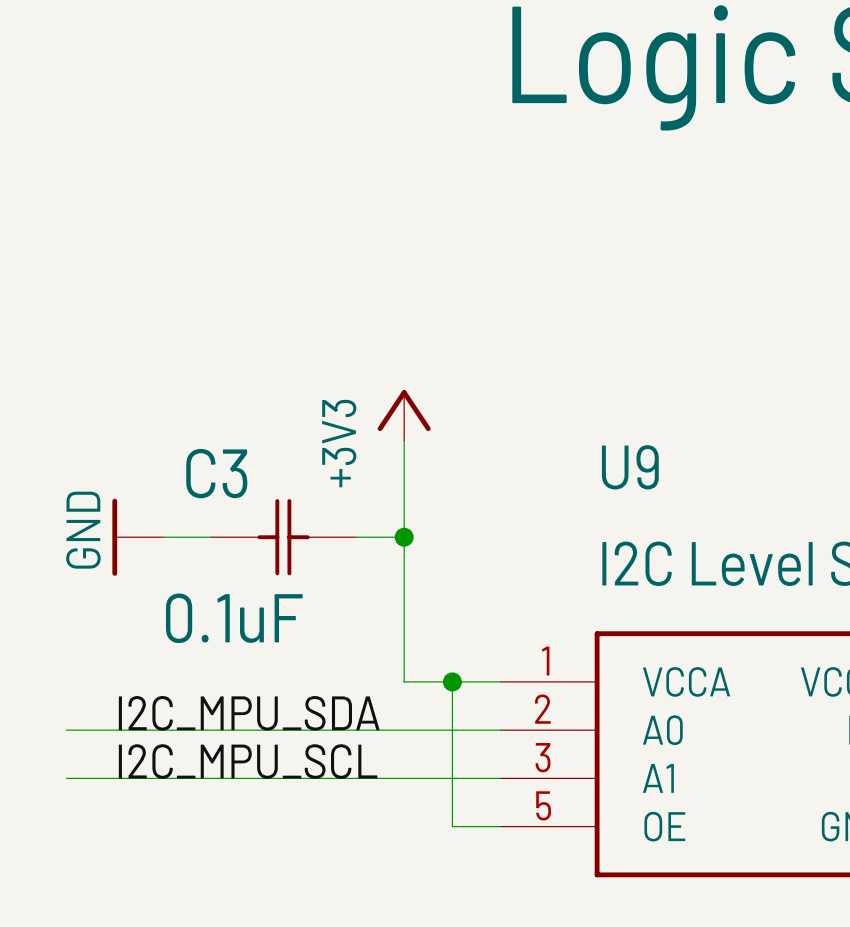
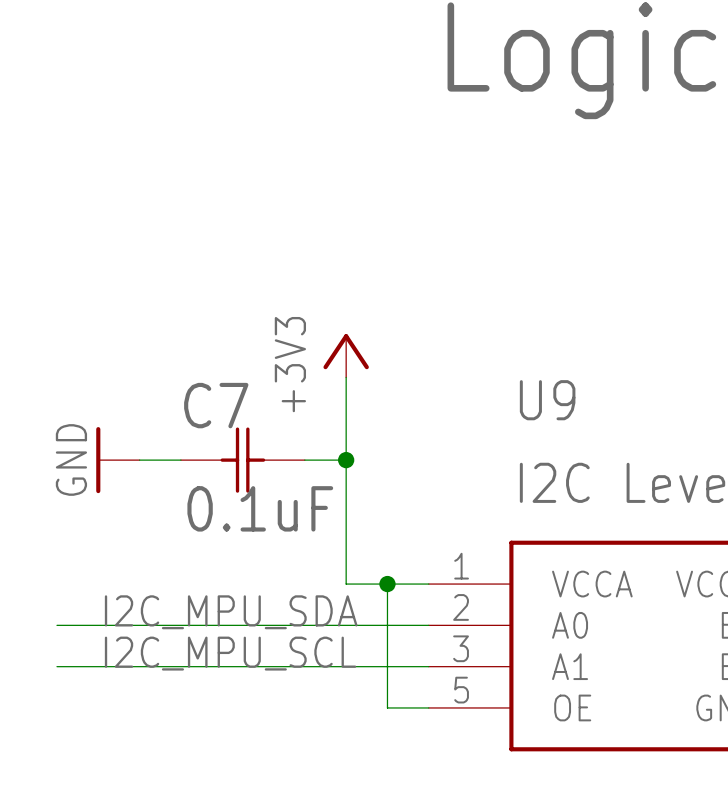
C3 name: C3 (216, 473) -> C7 (216, 405)
C3 value position: 0.1uF (234, 618) -> 0.1uF (260, 508)

